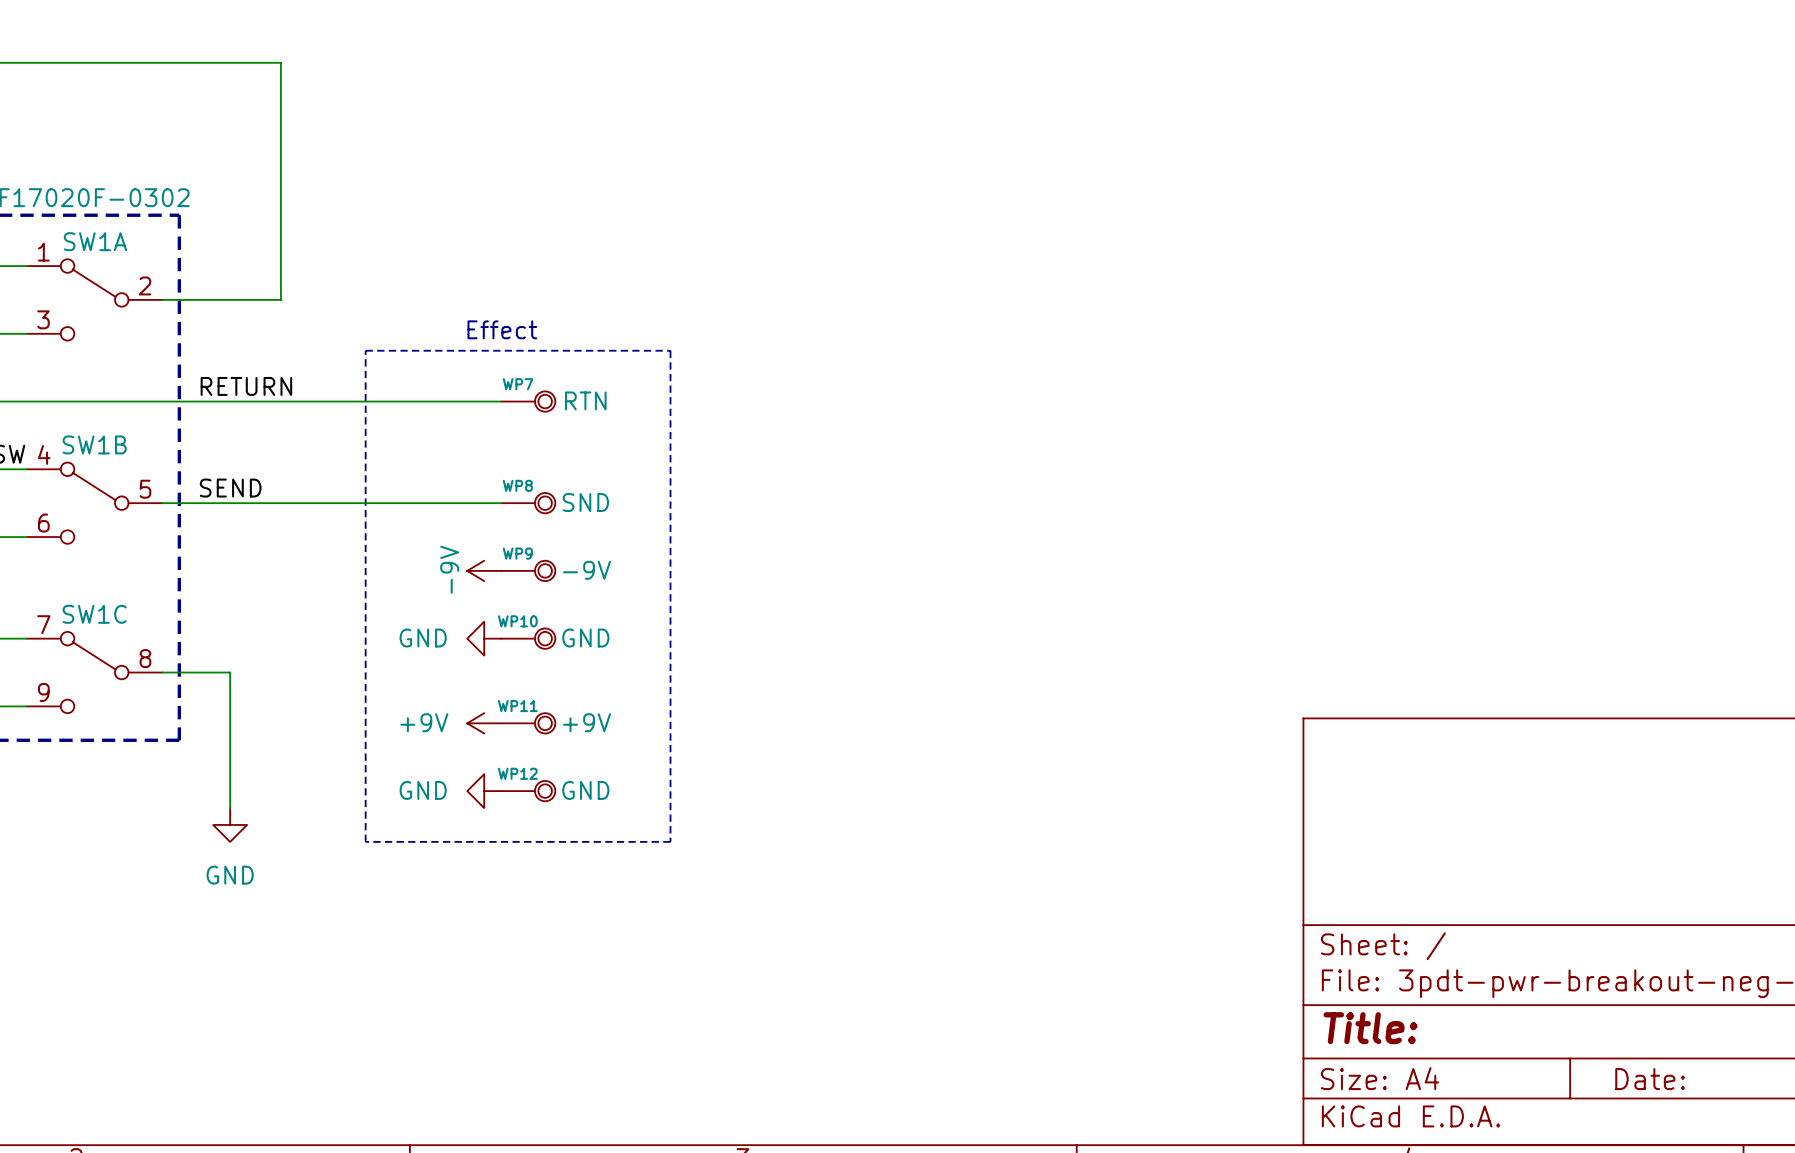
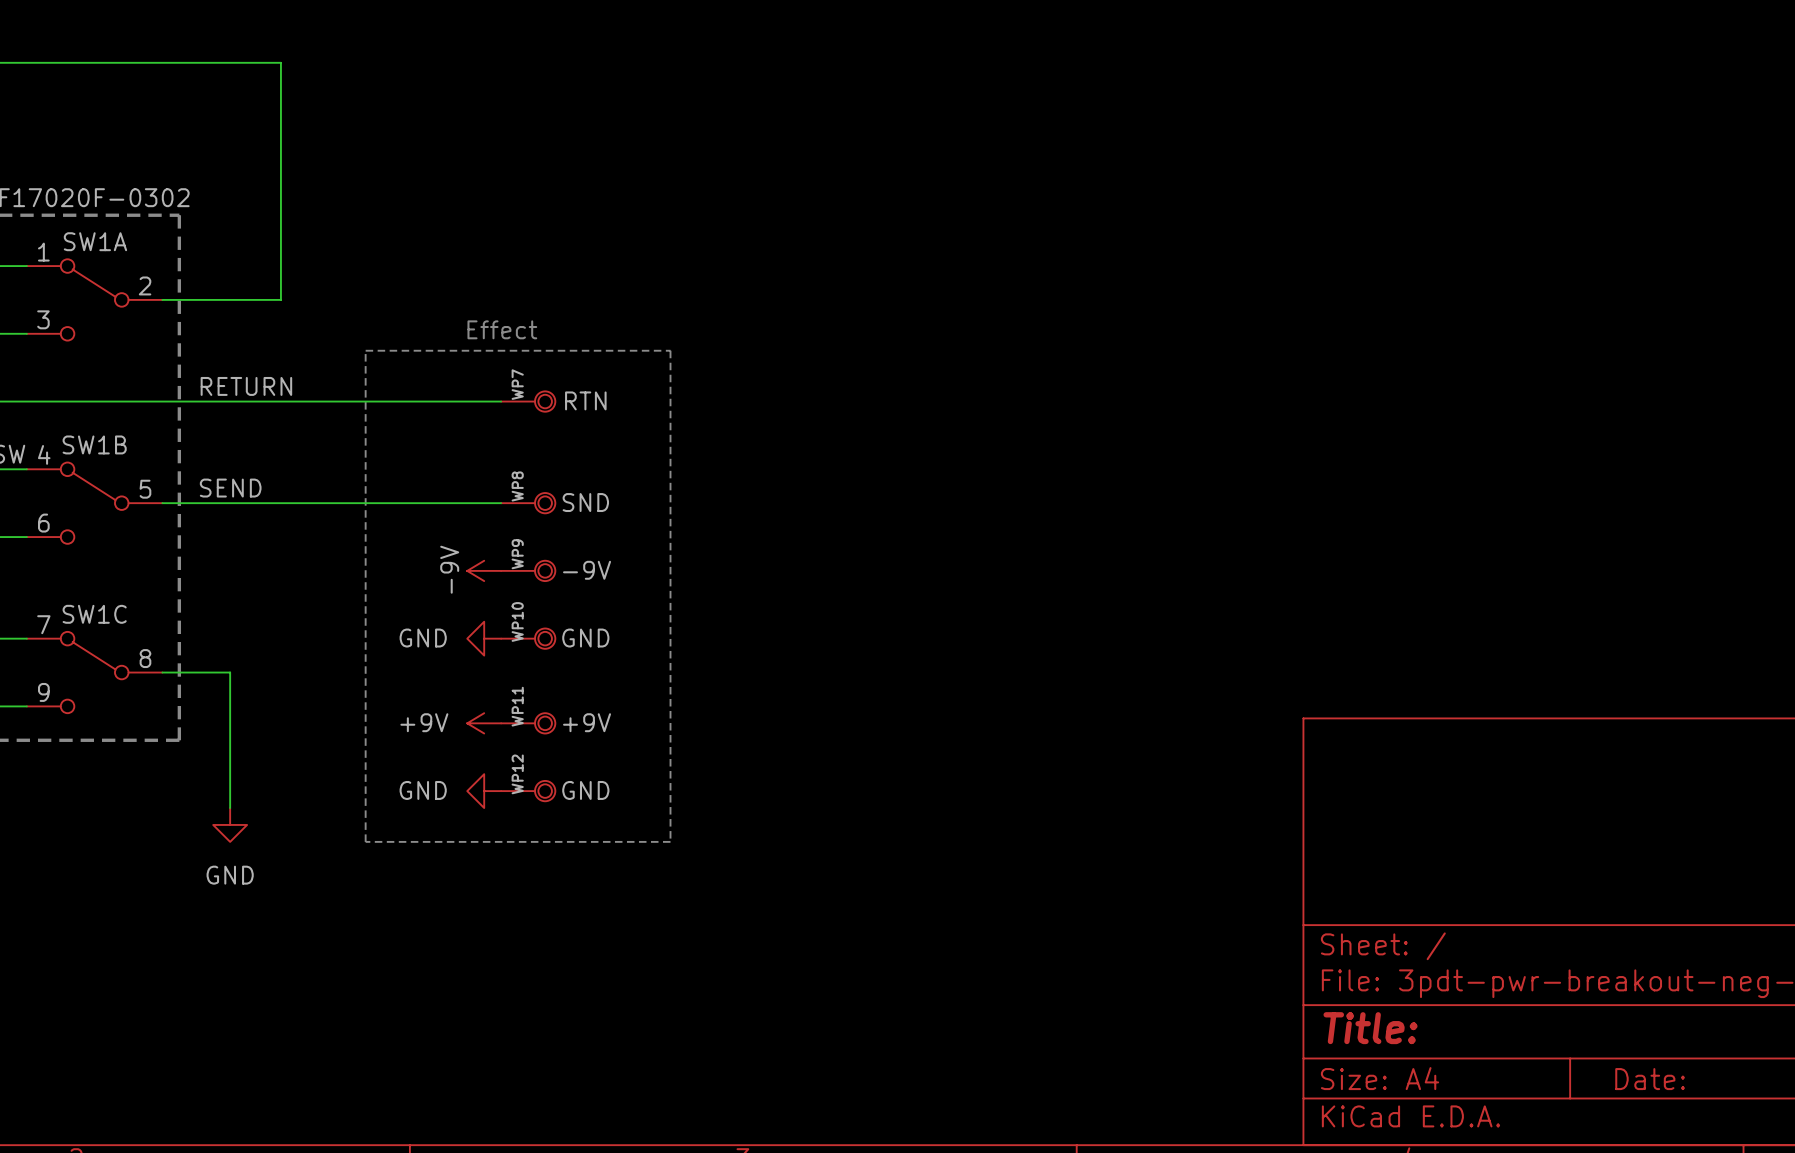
WP7 name rotation: 0° (518, 384) -> 90° counterclockwise (517, 384)
WP8 name rotation: 0° (517, 485) -> 90° counterclockwise (517, 486)
WP9 name rotation: 0° (517, 553) -> 90° counterclockwise (517, 554)
WP10 name rotation: 0° (517, 621) -> 90° counterclockwise (517, 621)
WP11 name rotation: 0° (517, 706) -> 90° counterclockwise (517, 706)
WP12 name rotation: 0° (517, 773) -> 90° counterclockwise (517, 774)

